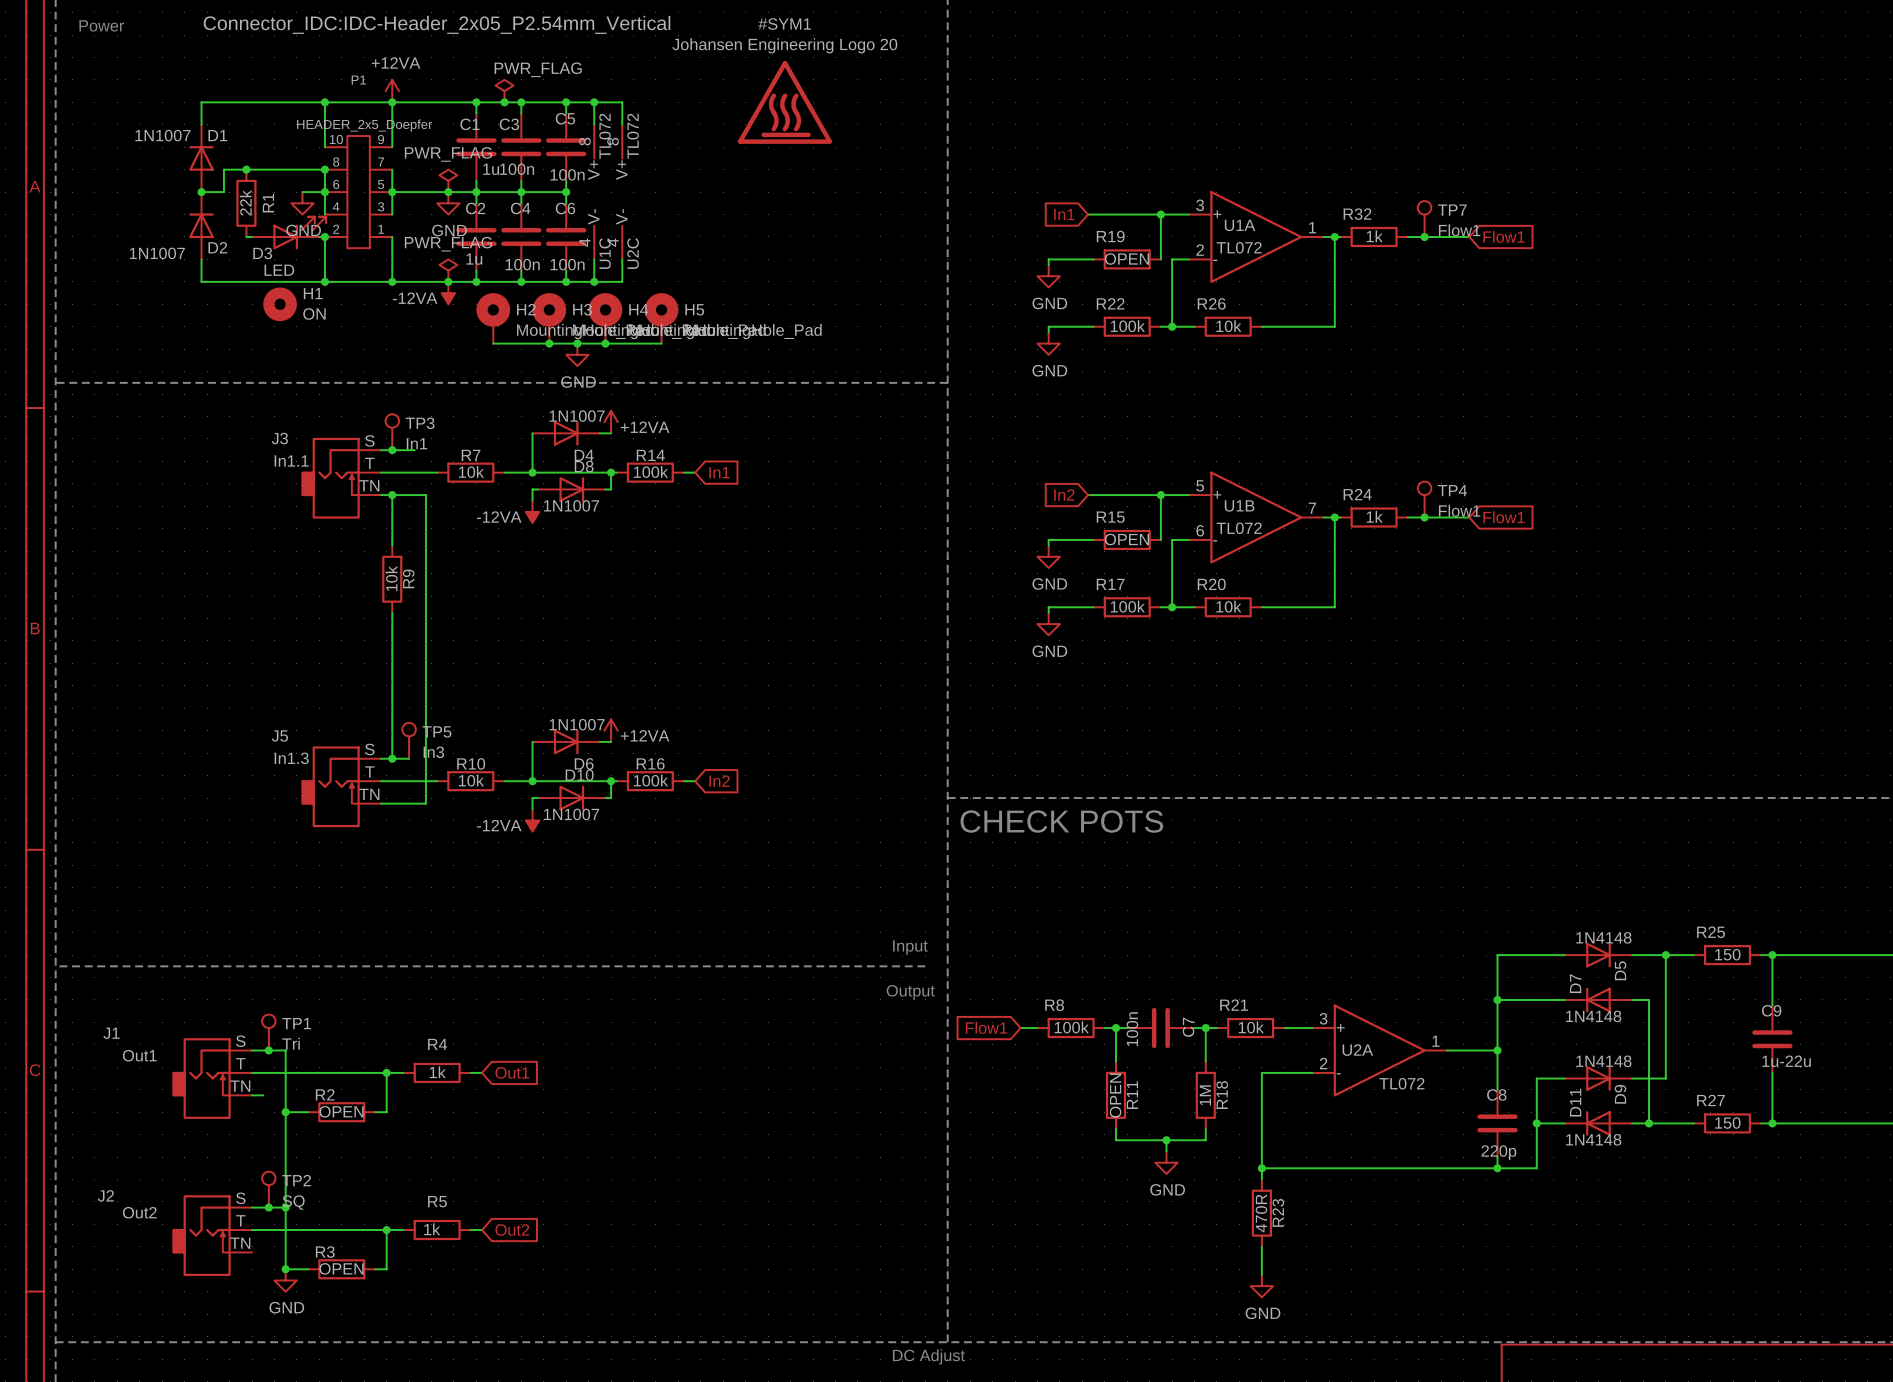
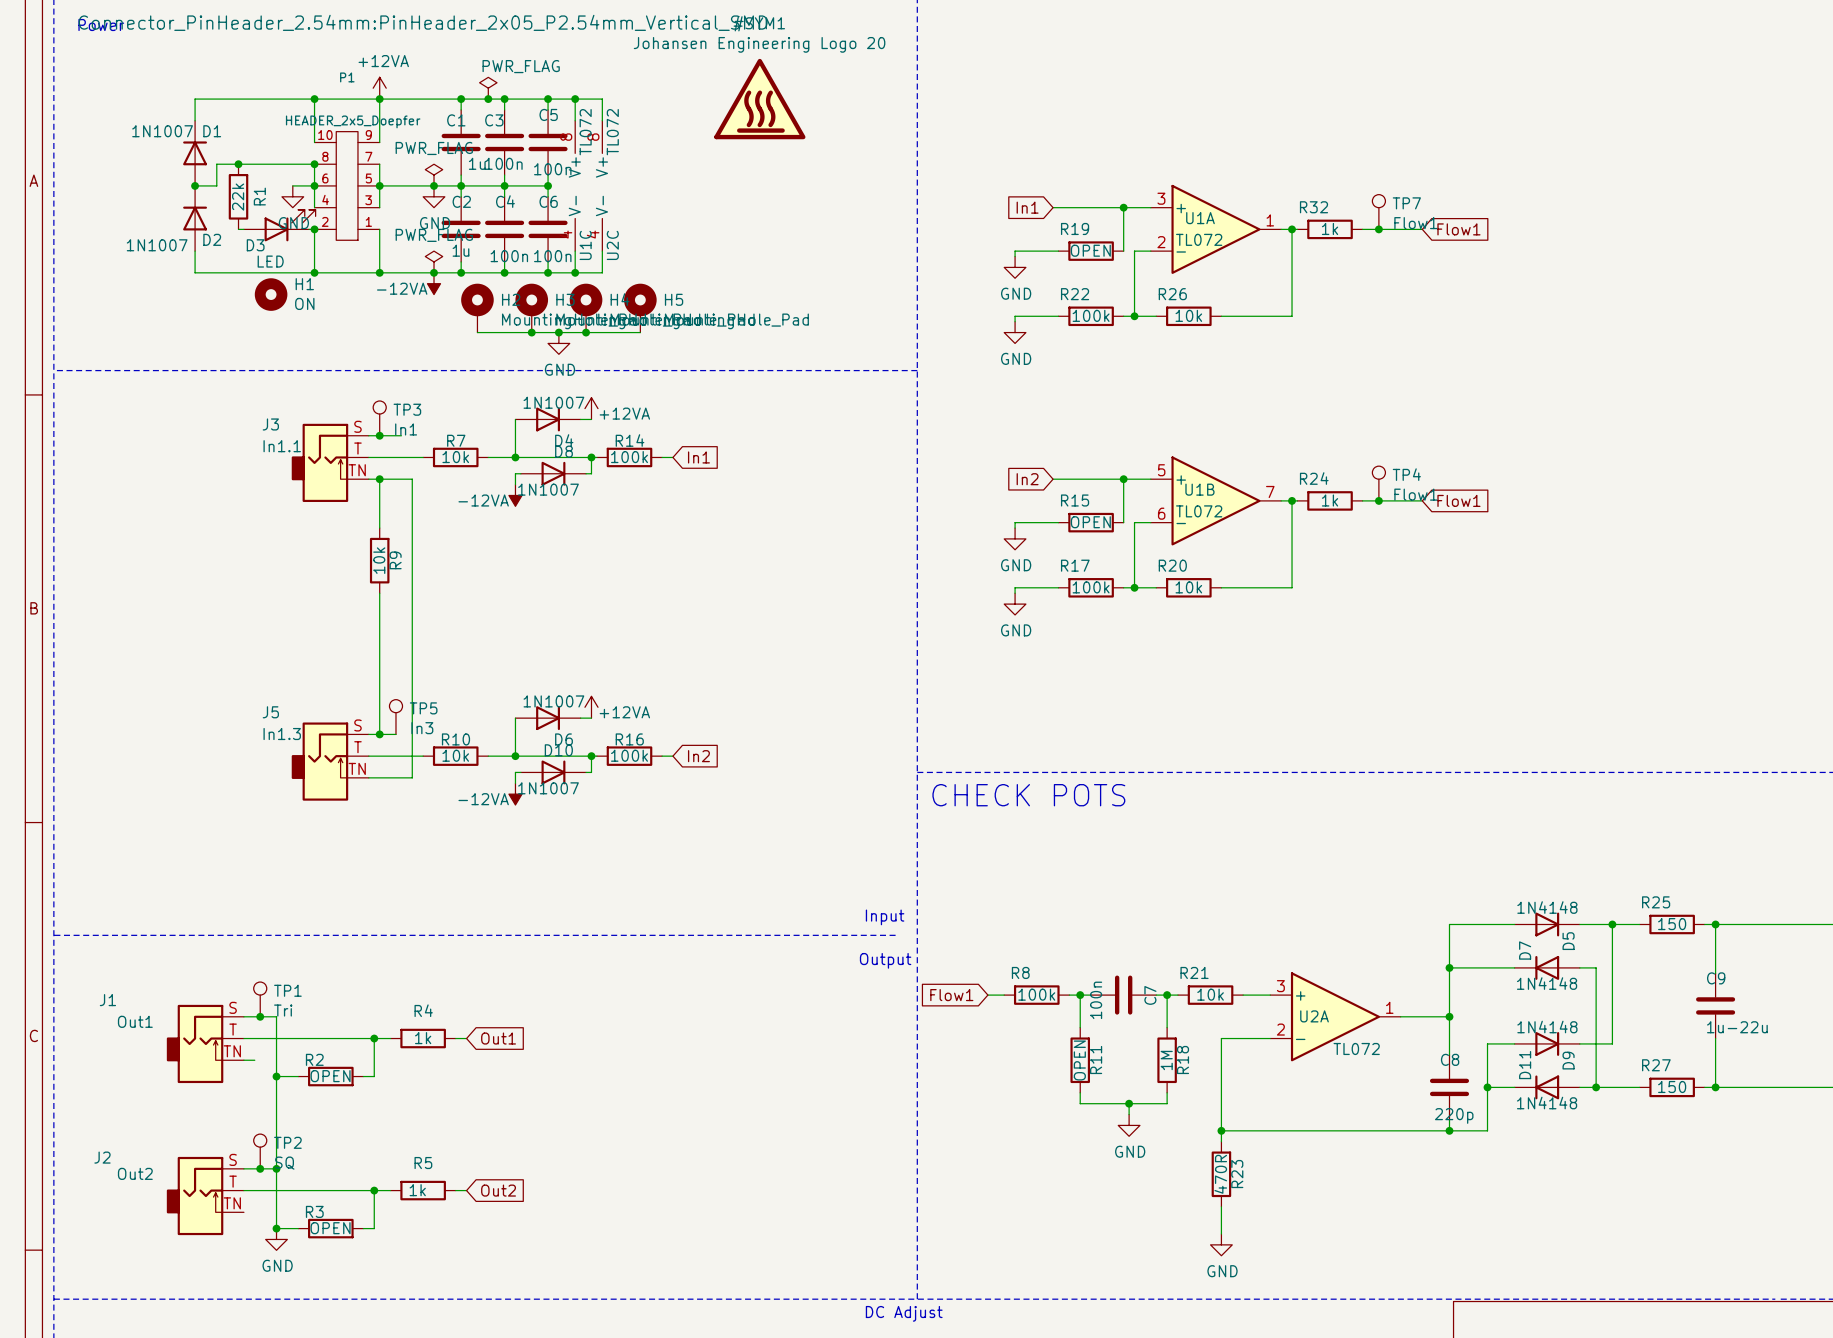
P1 text: Connector_IDC:IDC-Header_2x05_P2.54mm_Vertical (437, 24) -> Connector_PinHeader_2.54mm:PinHeader_2x05_P2.54mm_Vertical_SMD (423, 22)

